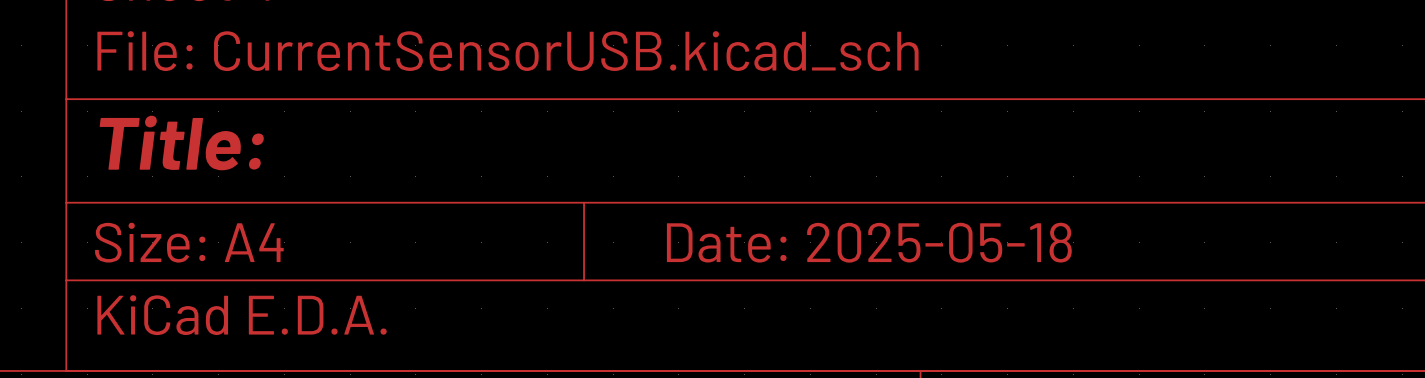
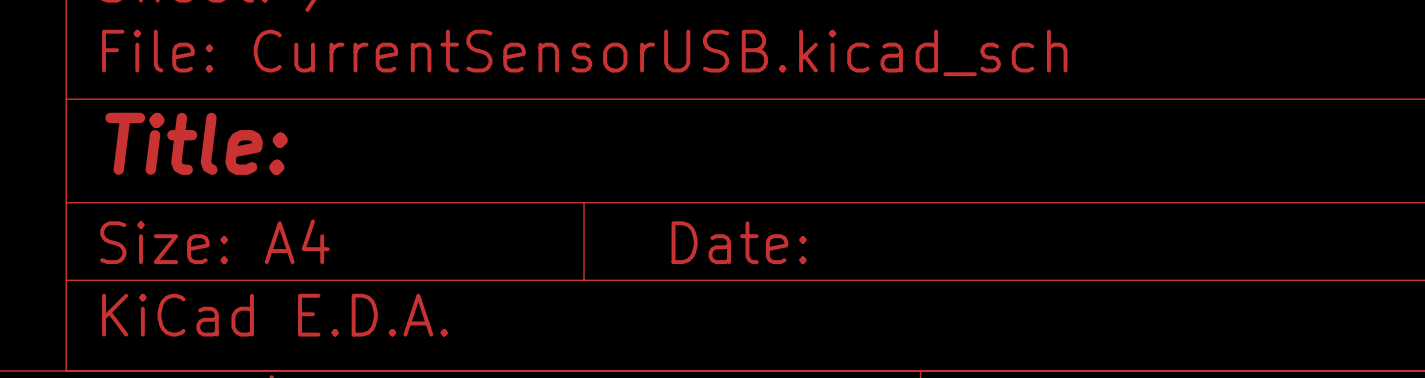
title block: Date: 2025-05-18 (869, 242) -> Date: (739, 242)

